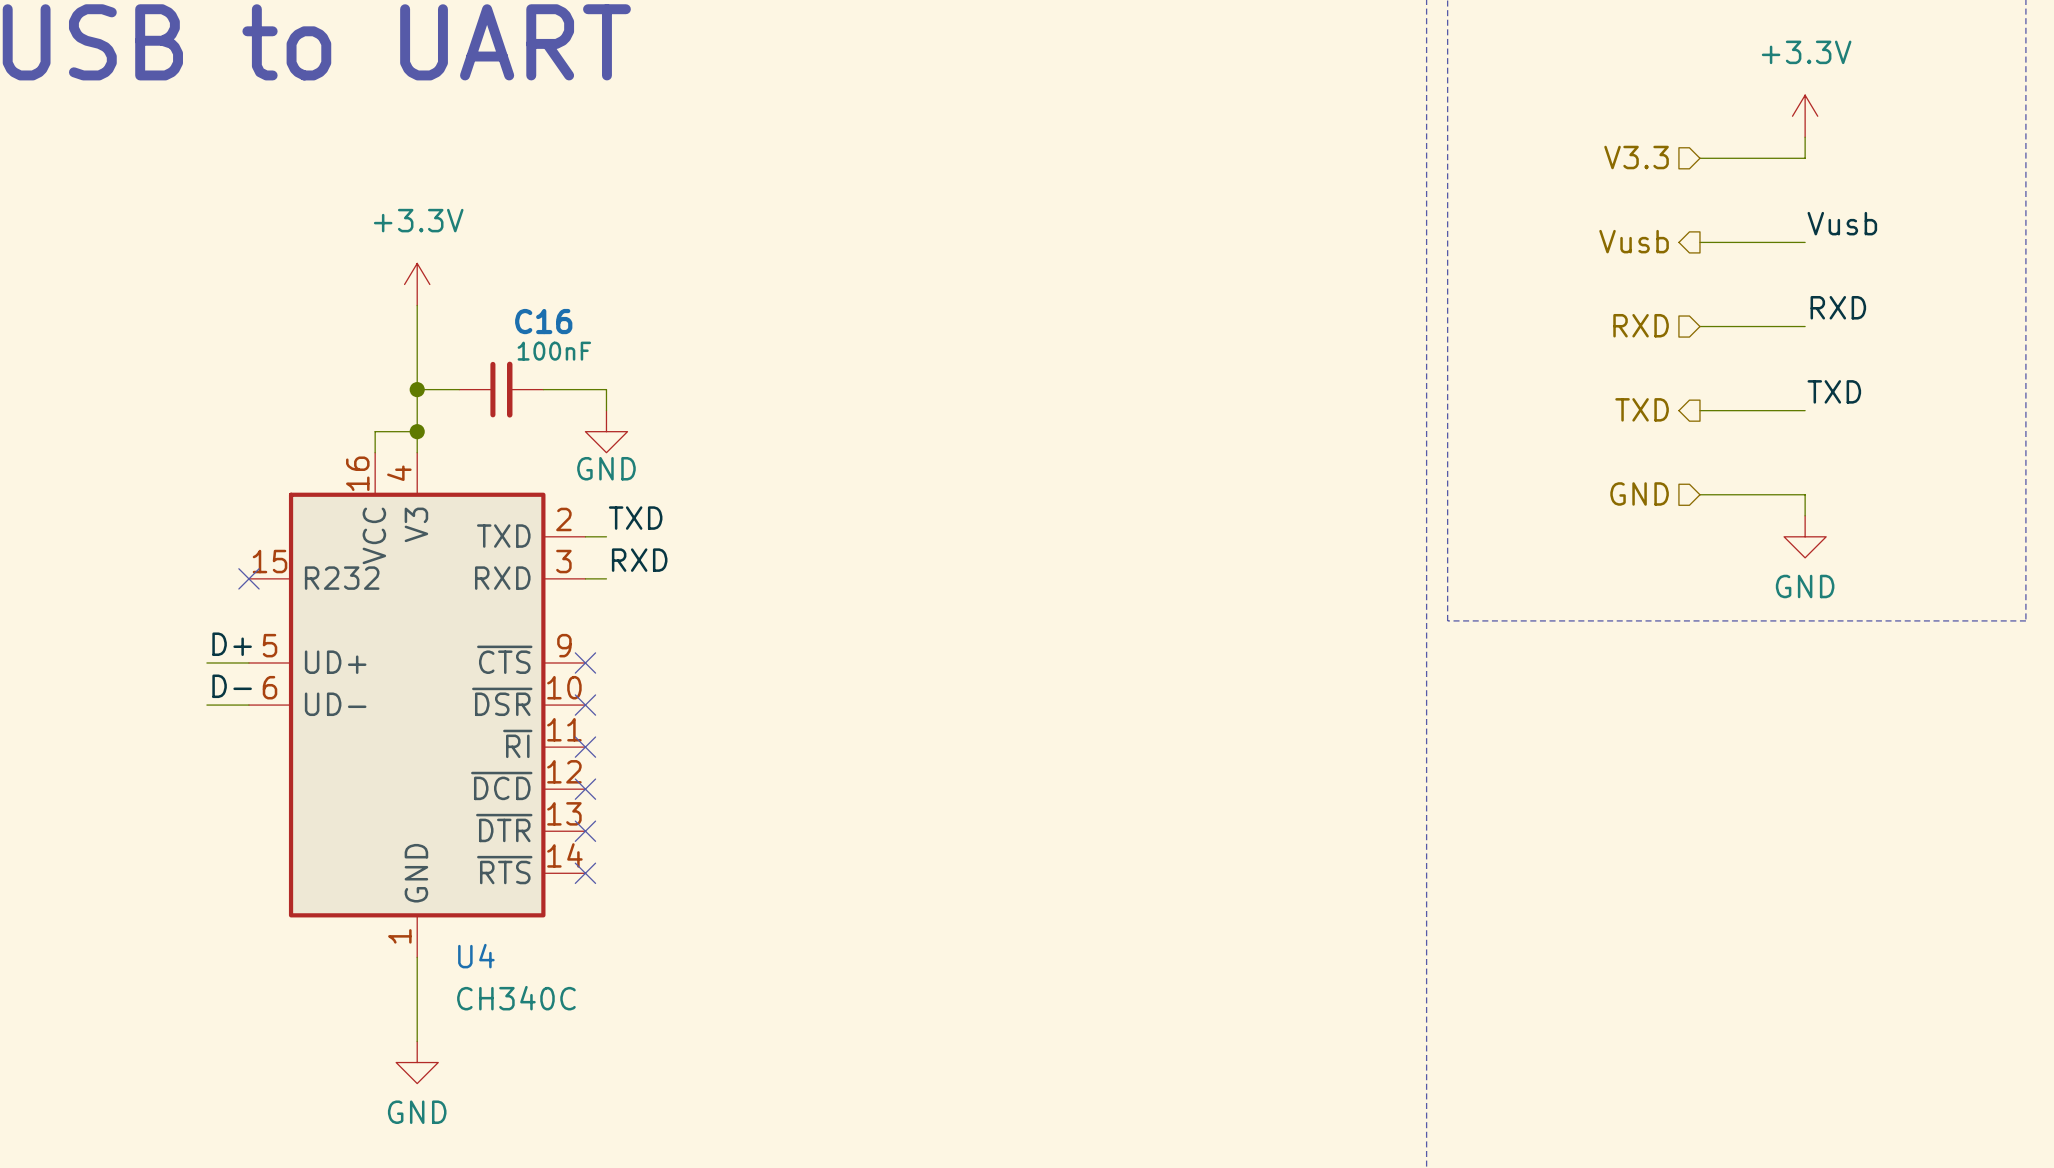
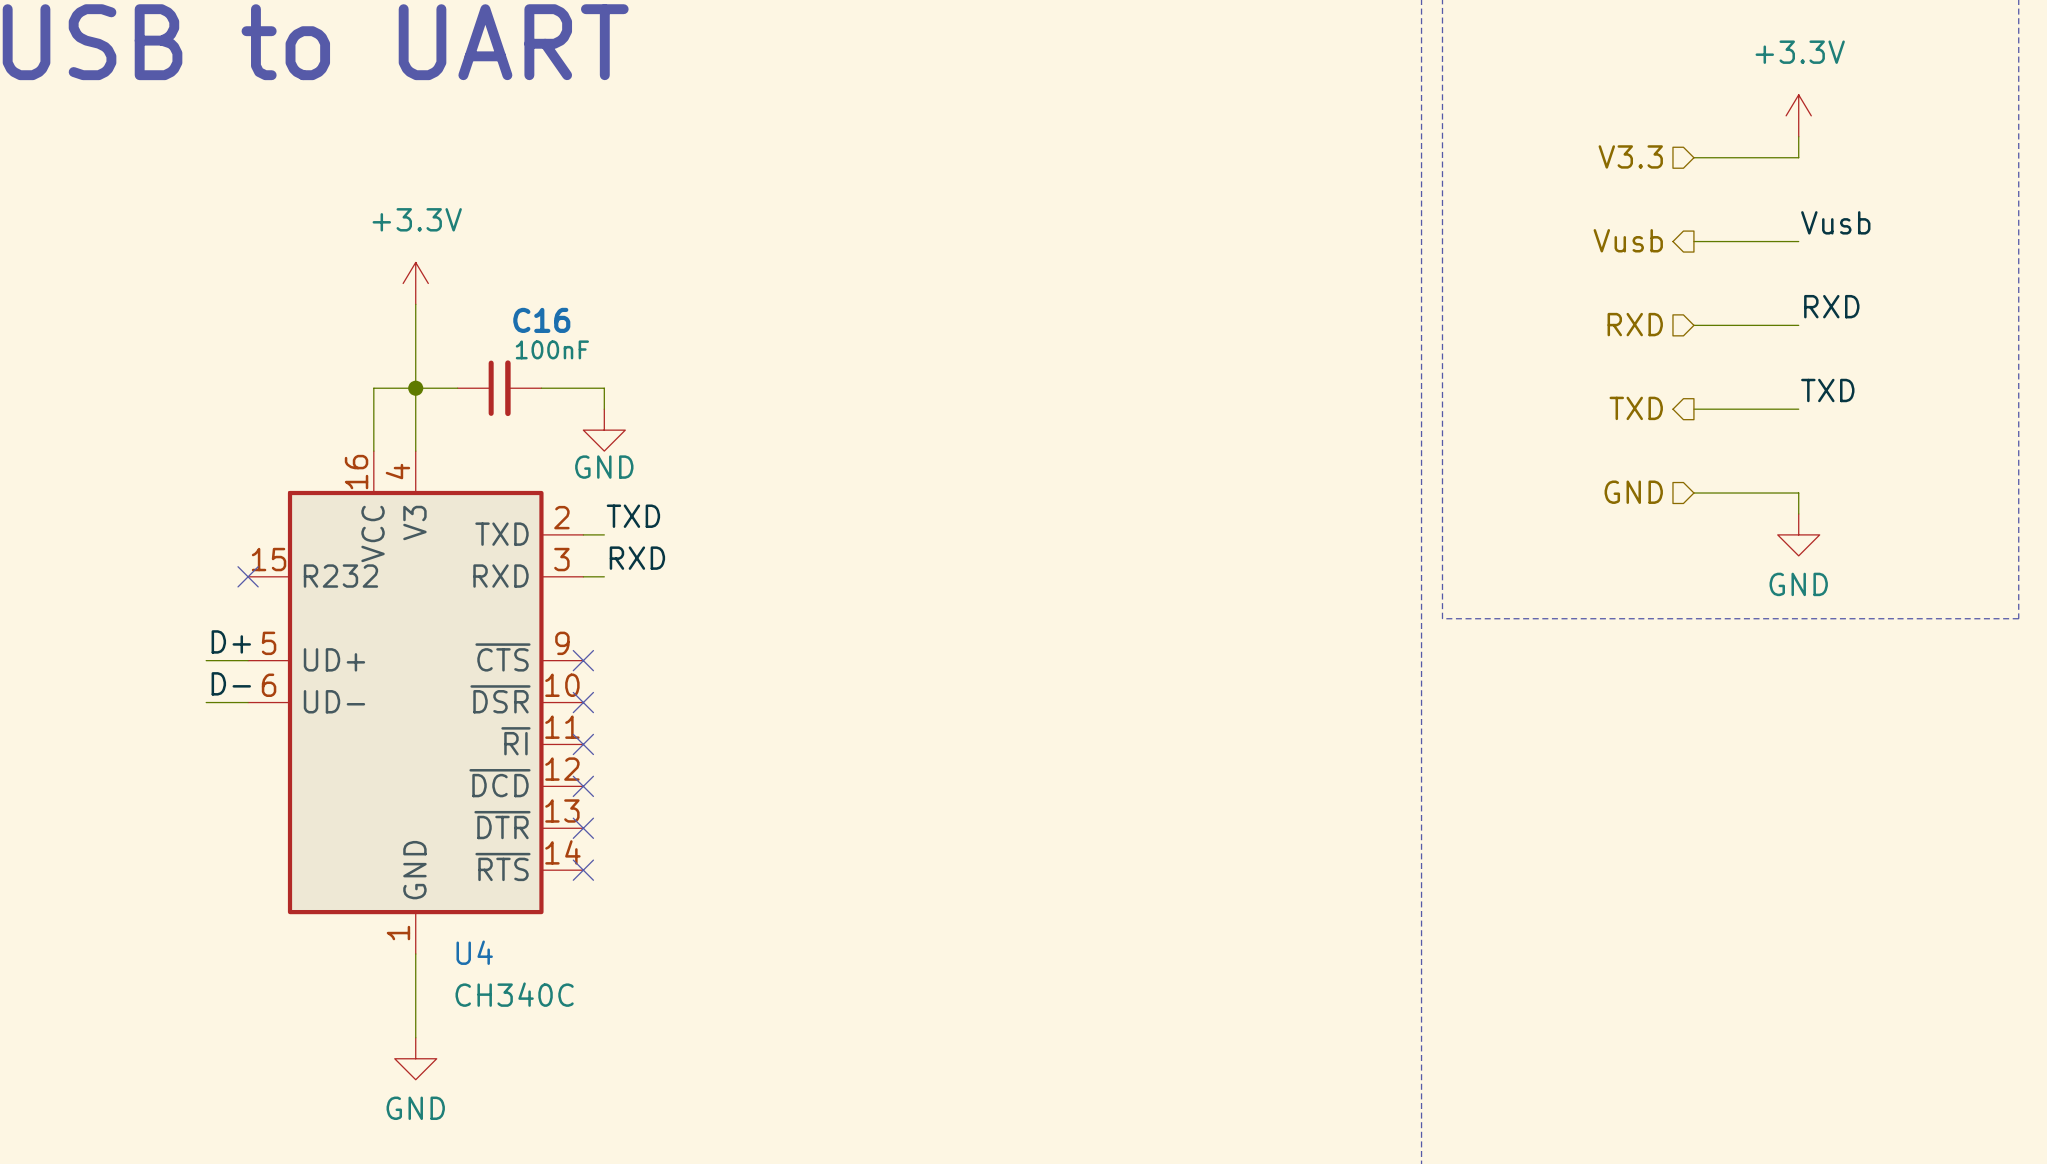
wire: (375, 431) (417, 431) -> (373, 430) (373, 388) (415, 388)
junction: (417, 431) -> none

